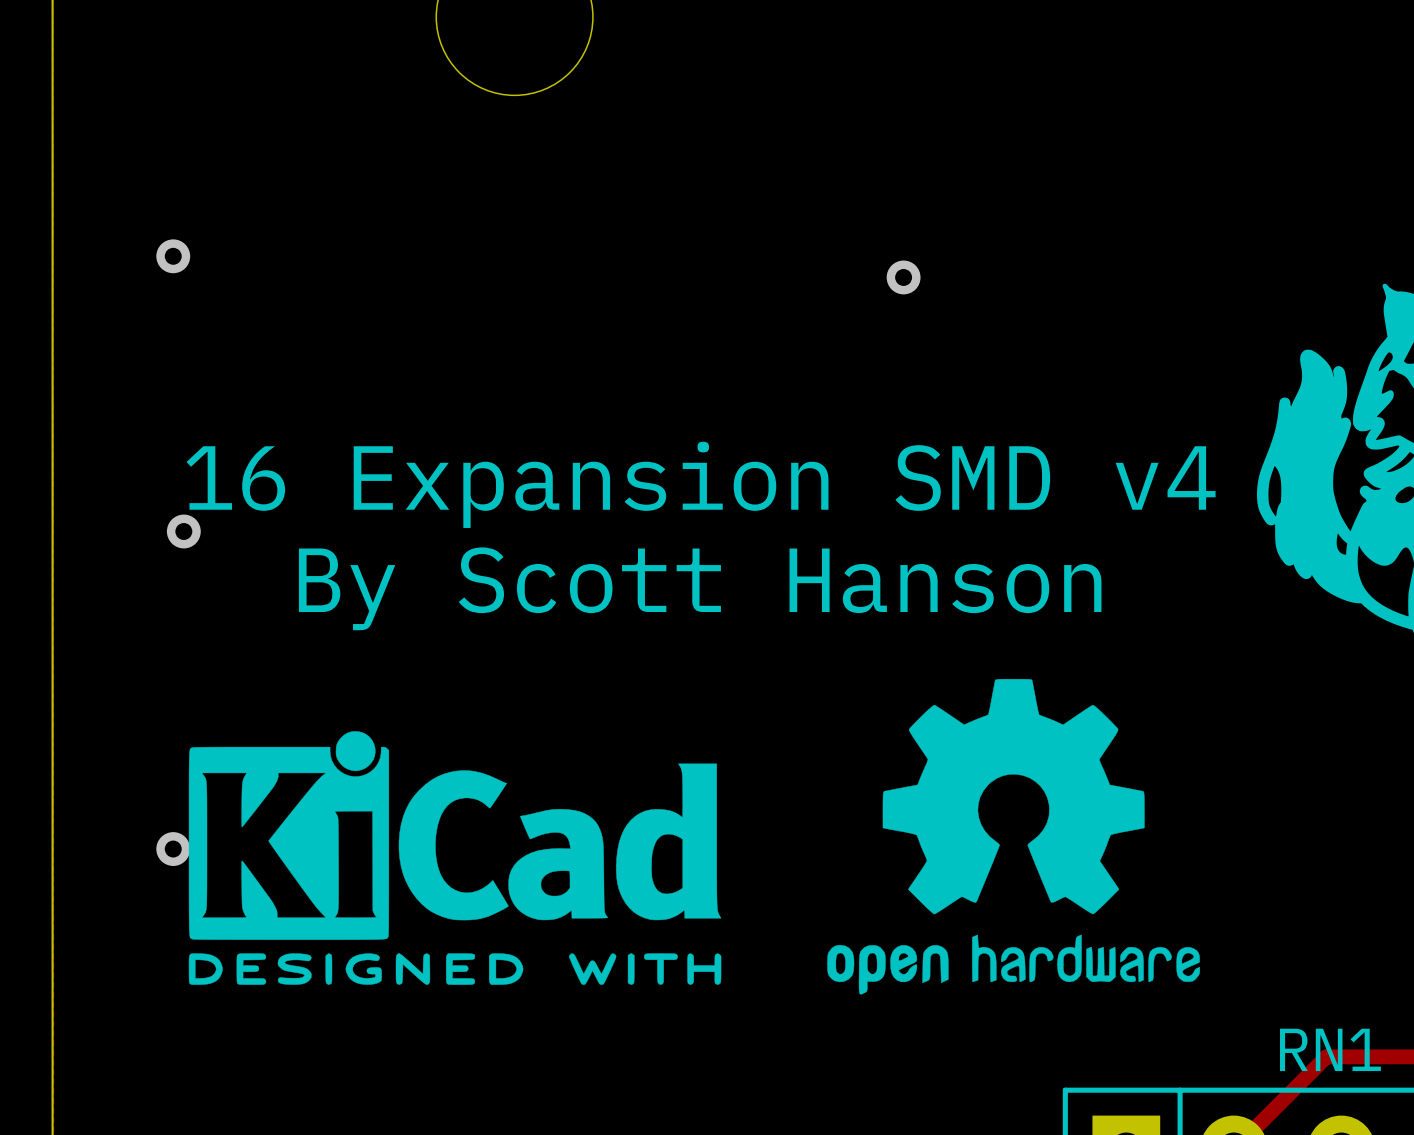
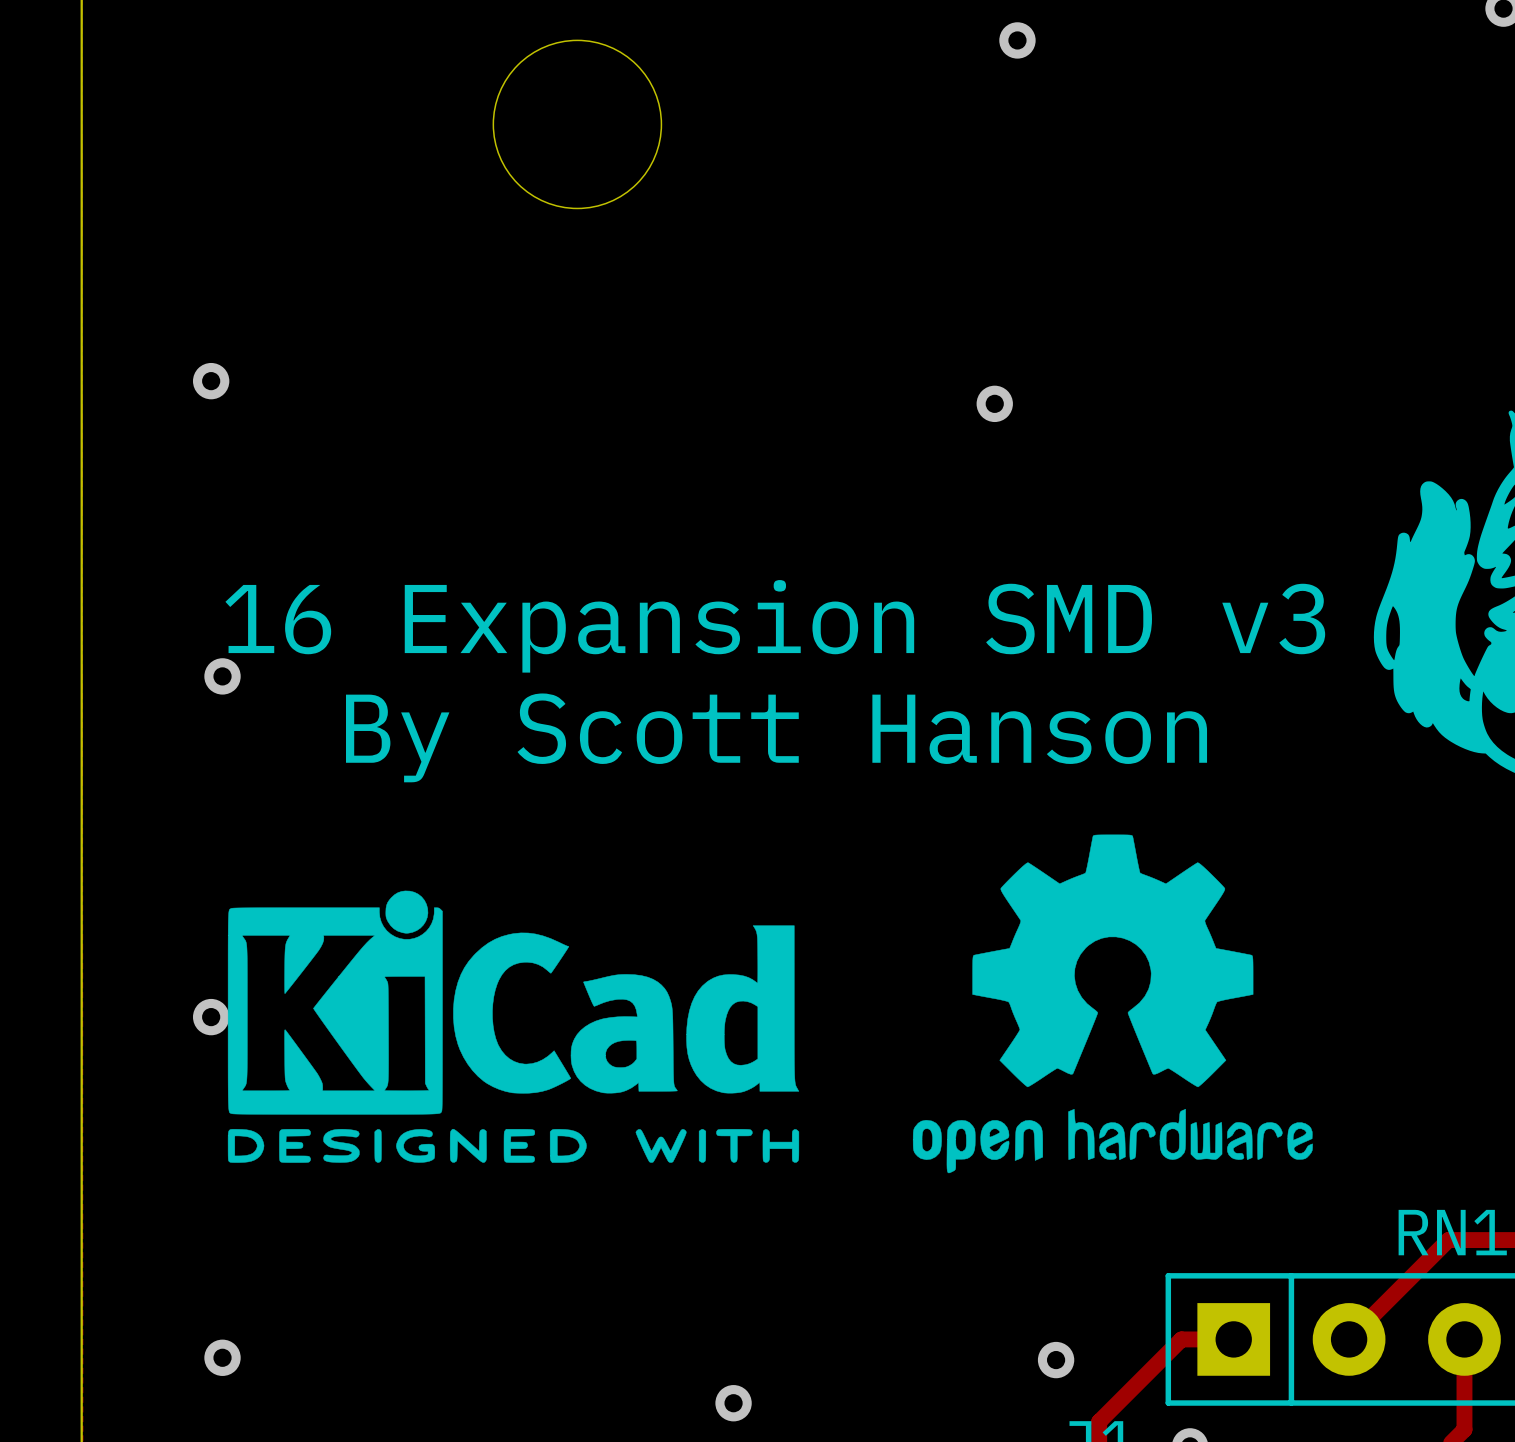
text: 16 Expansion SMD v4 (701, 484) -> 16 Expansion SMD v3 (775, 626)

